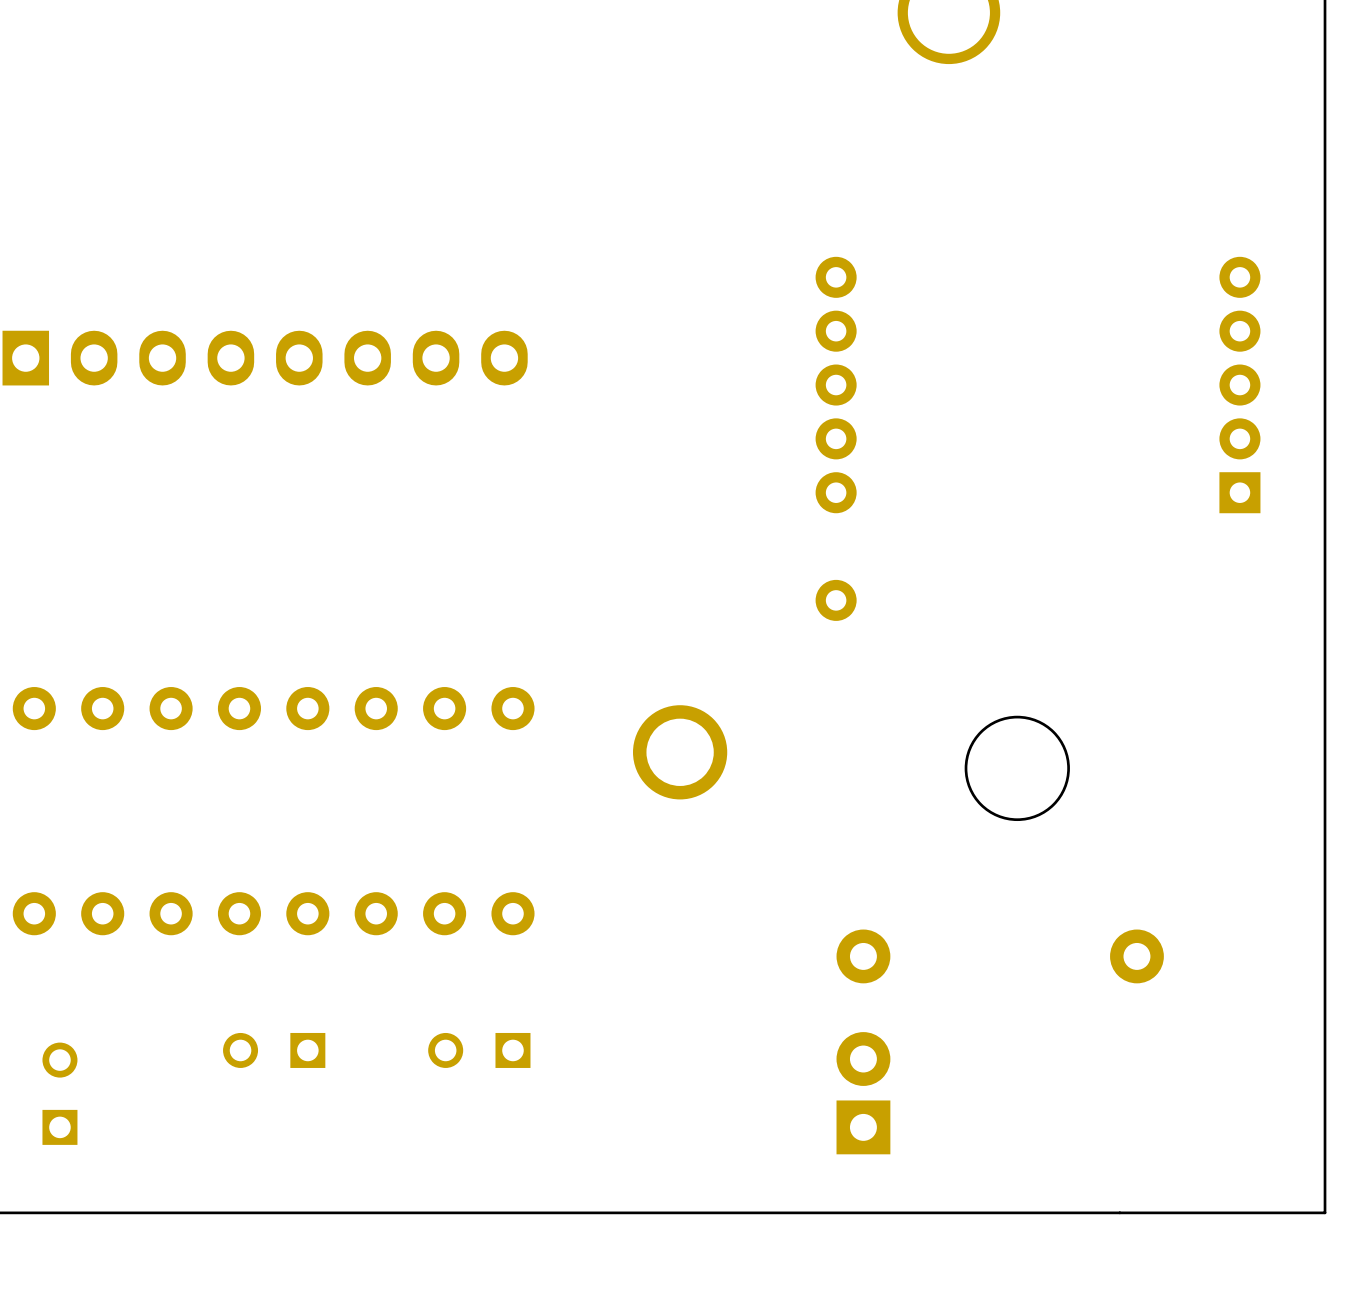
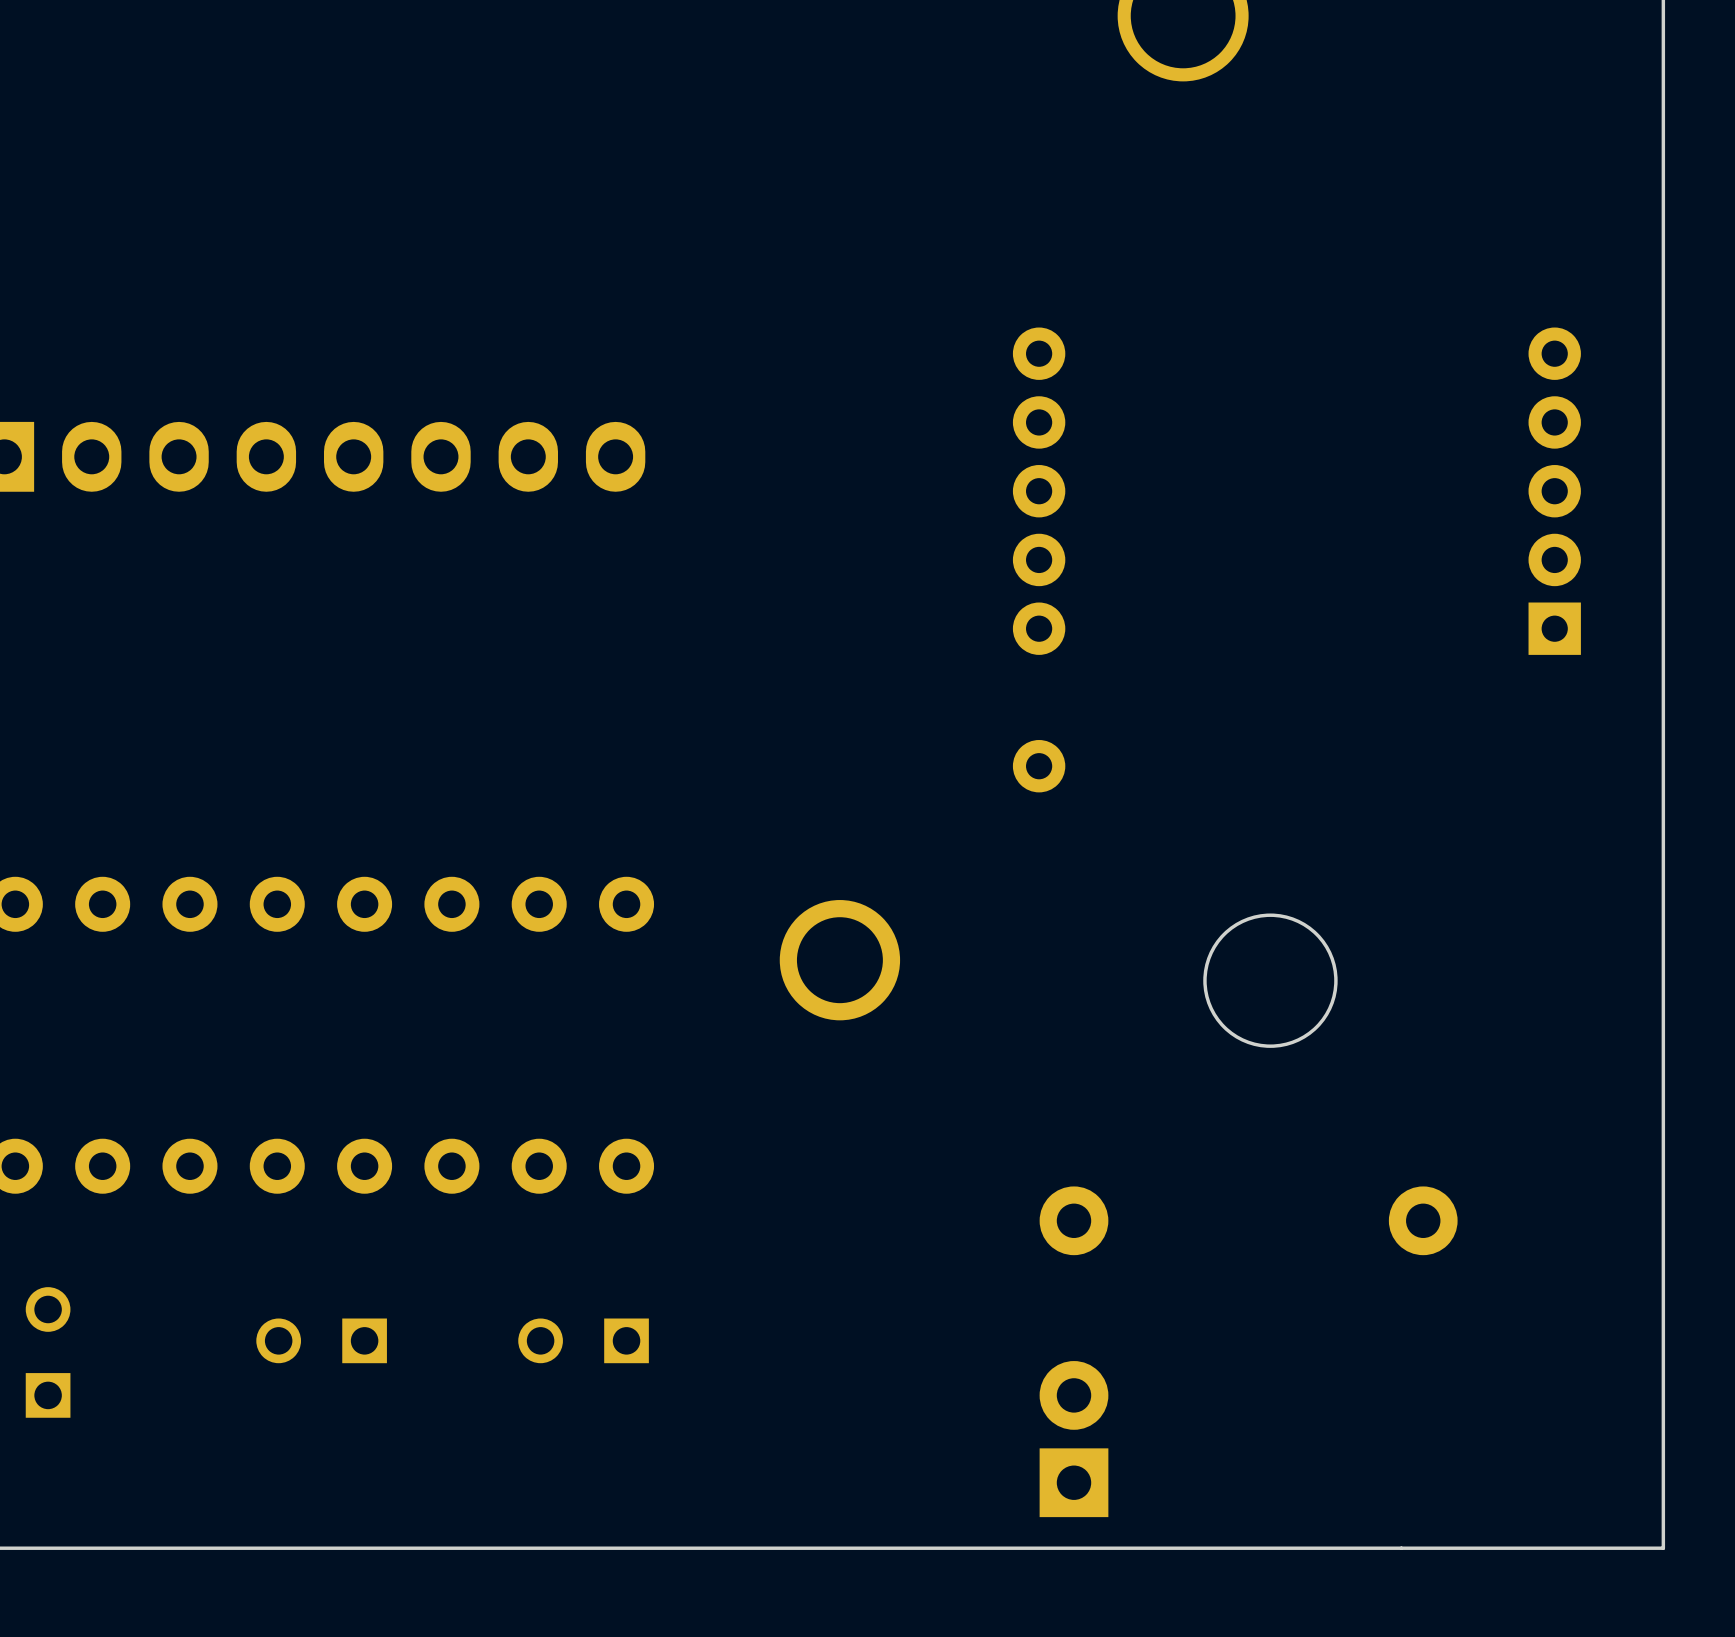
part position: (59, 1093) -> (48, 1352)
part position: (863, 1093) -> (1073, 1439)

